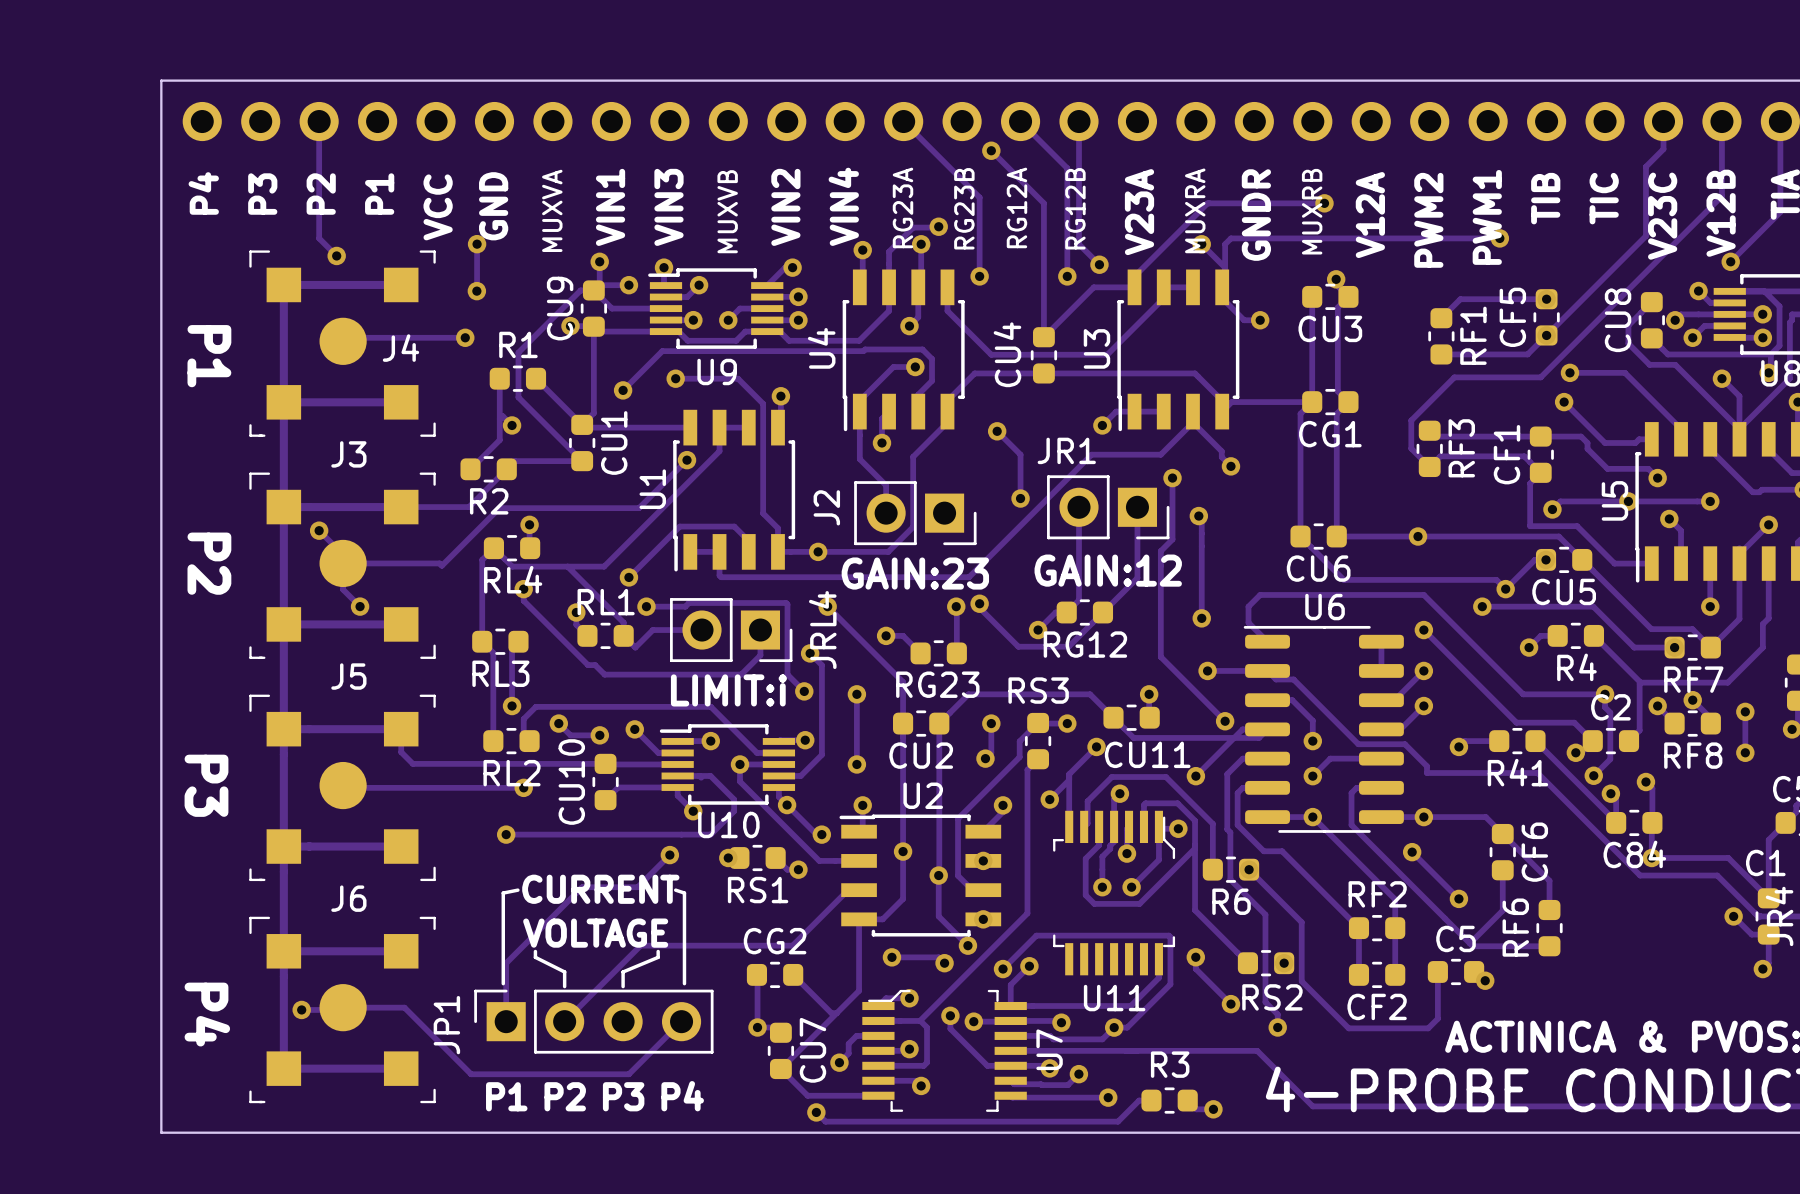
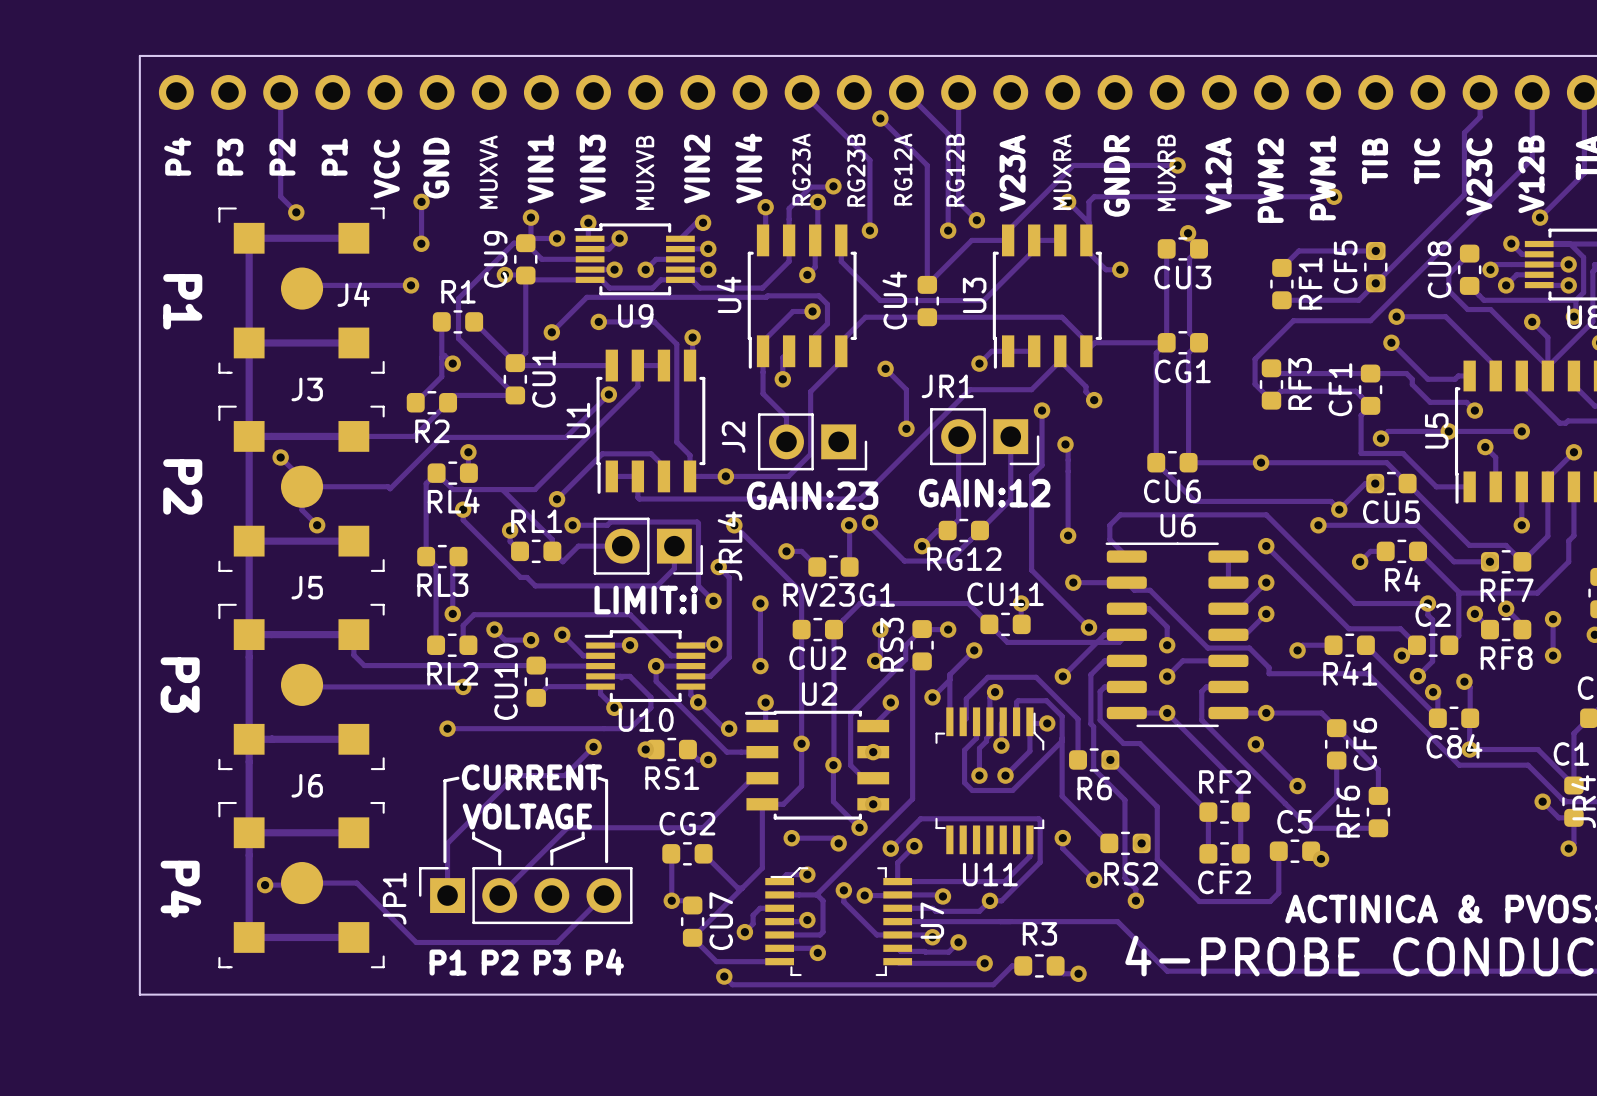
RG23 name: RG23 (937, 684) -> RV23G1 (839, 594)
RS3 name rotation: 0° (1038, 690) -> 90° counterclockwise (891, 644)
CU11 name position: CU11 (1147, 754) -> CU11 (1005, 594)

